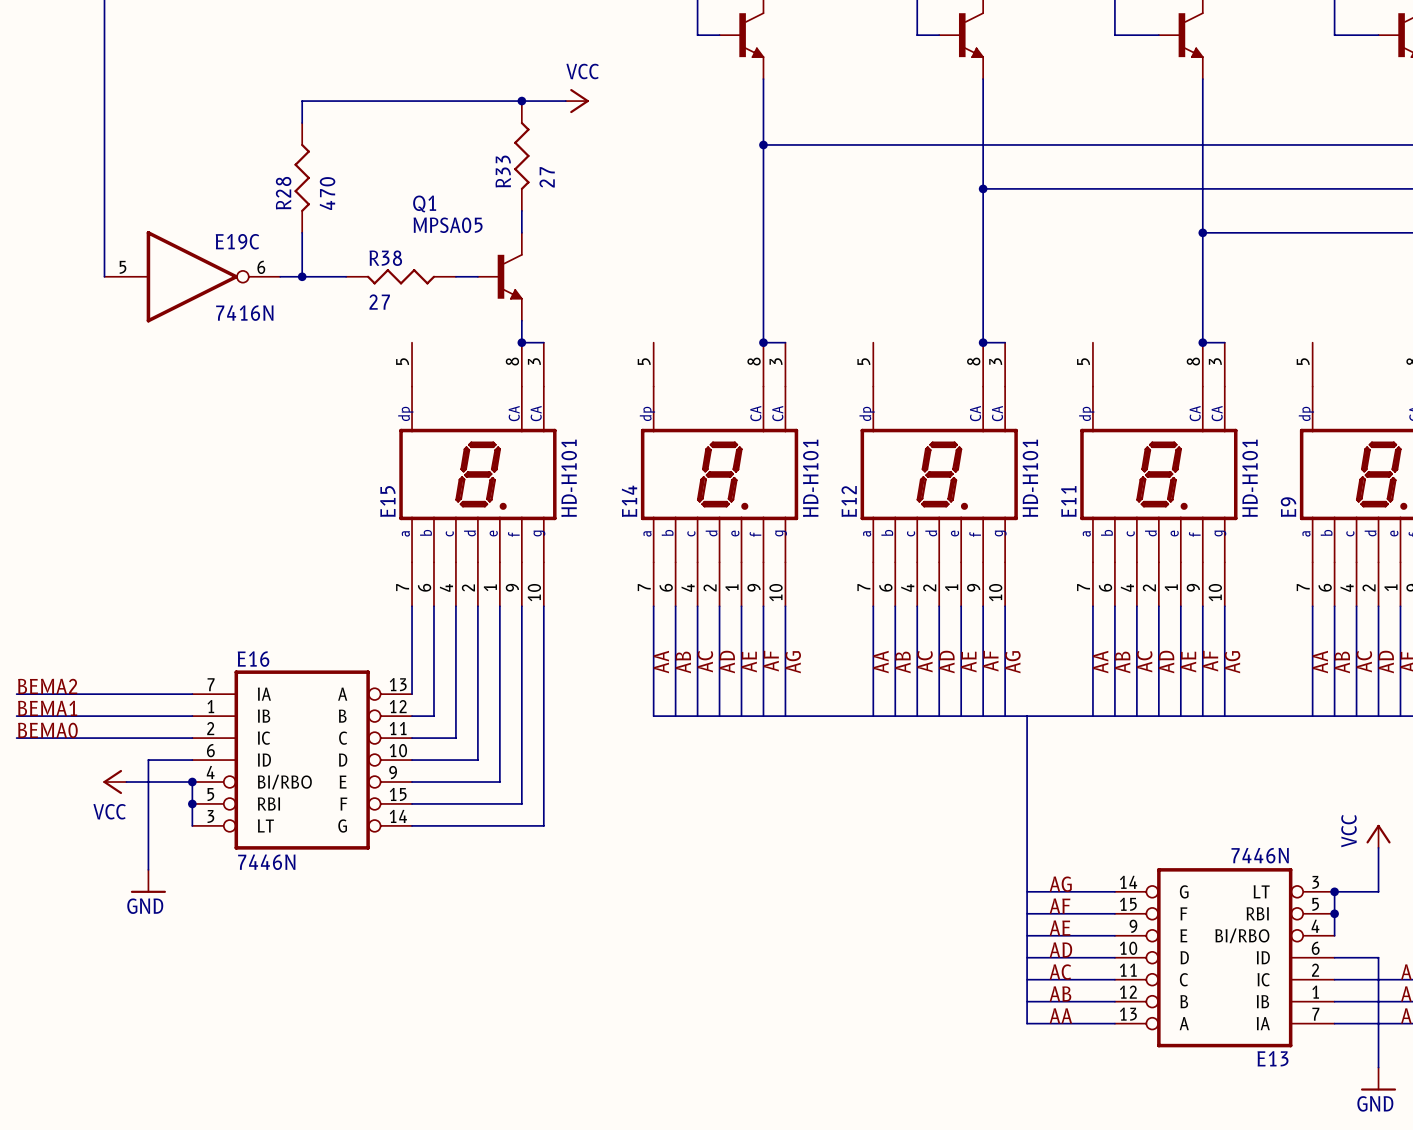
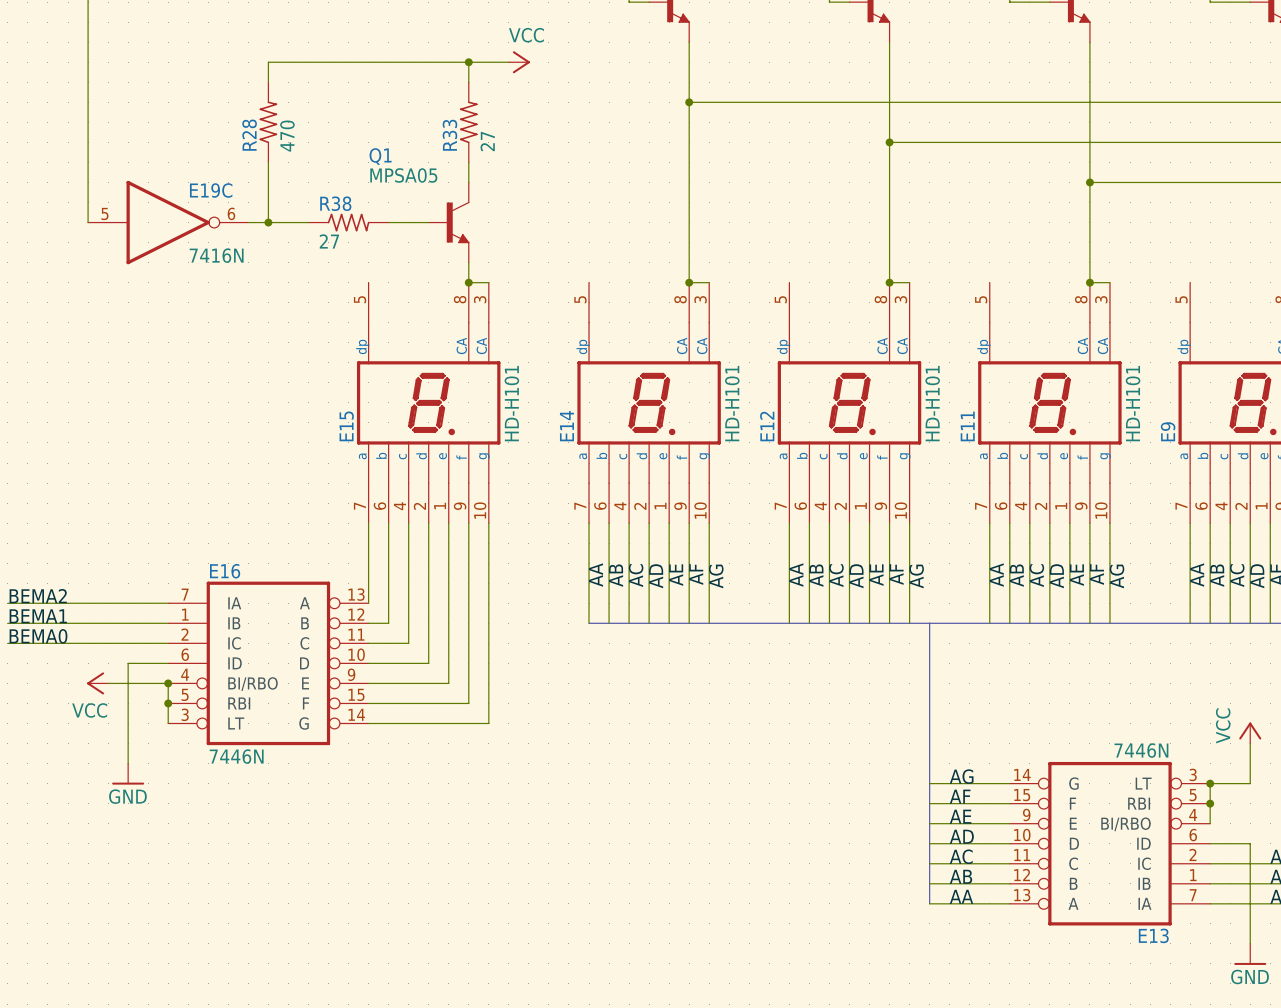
R33 symbol: [514, 101, 530, 211] -> [459, 82, 478, 163]
R28 symbol: [294, 123, 310, 233] -> [259, 82, 278, 163]
R38 symbol: [346, 269, 456, 285] -> [308, 213, 389, 232]

